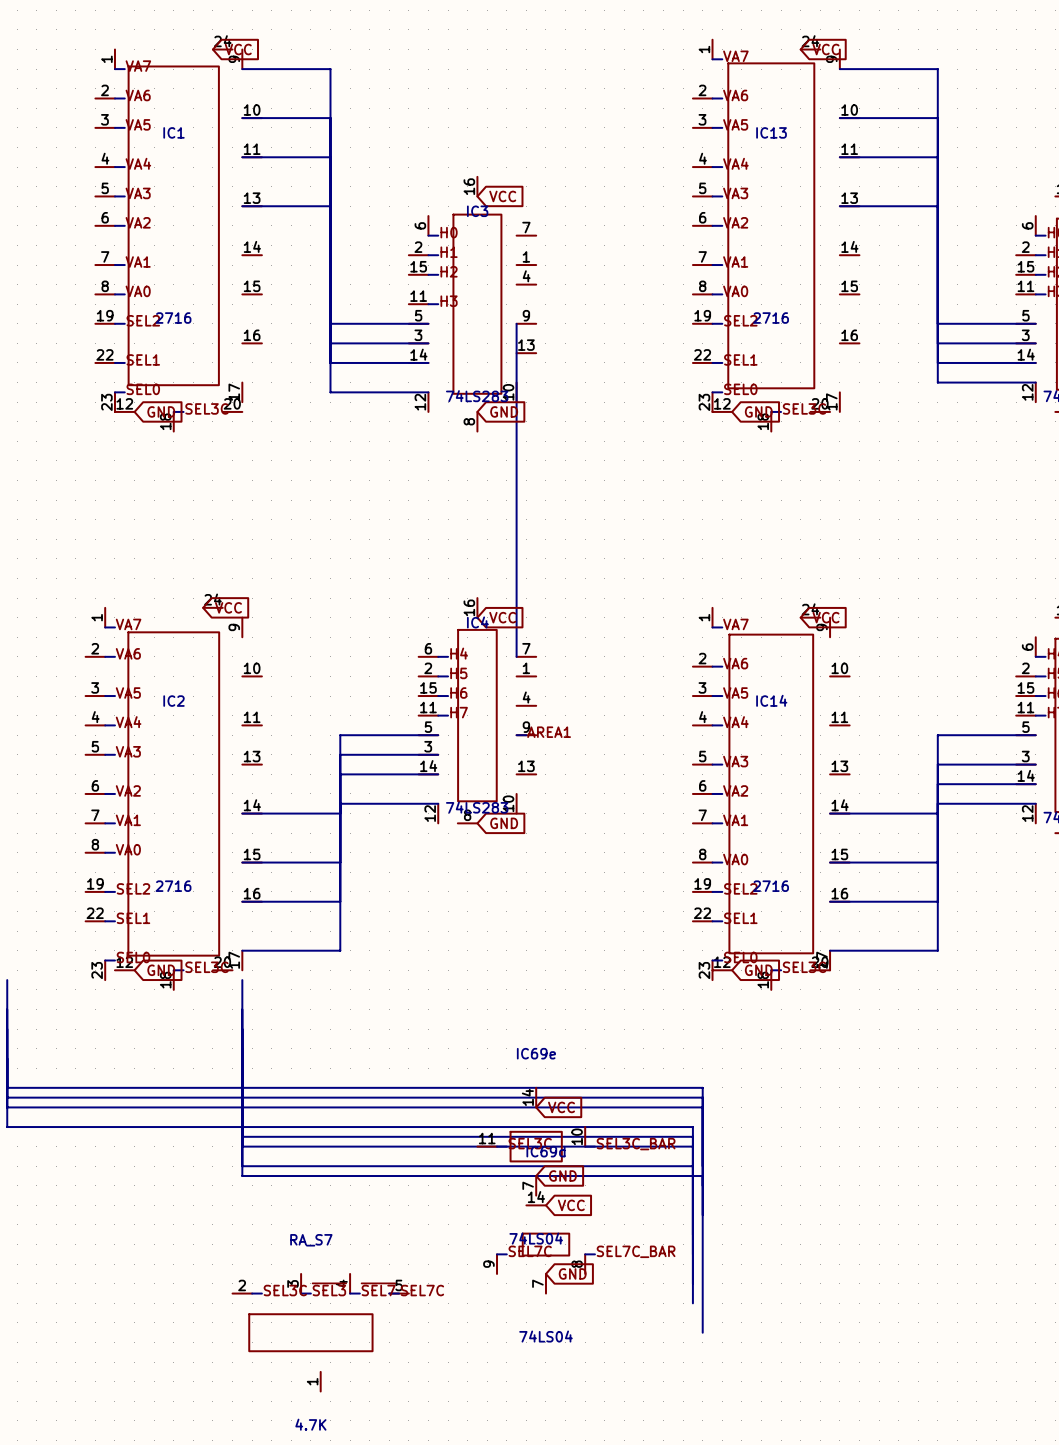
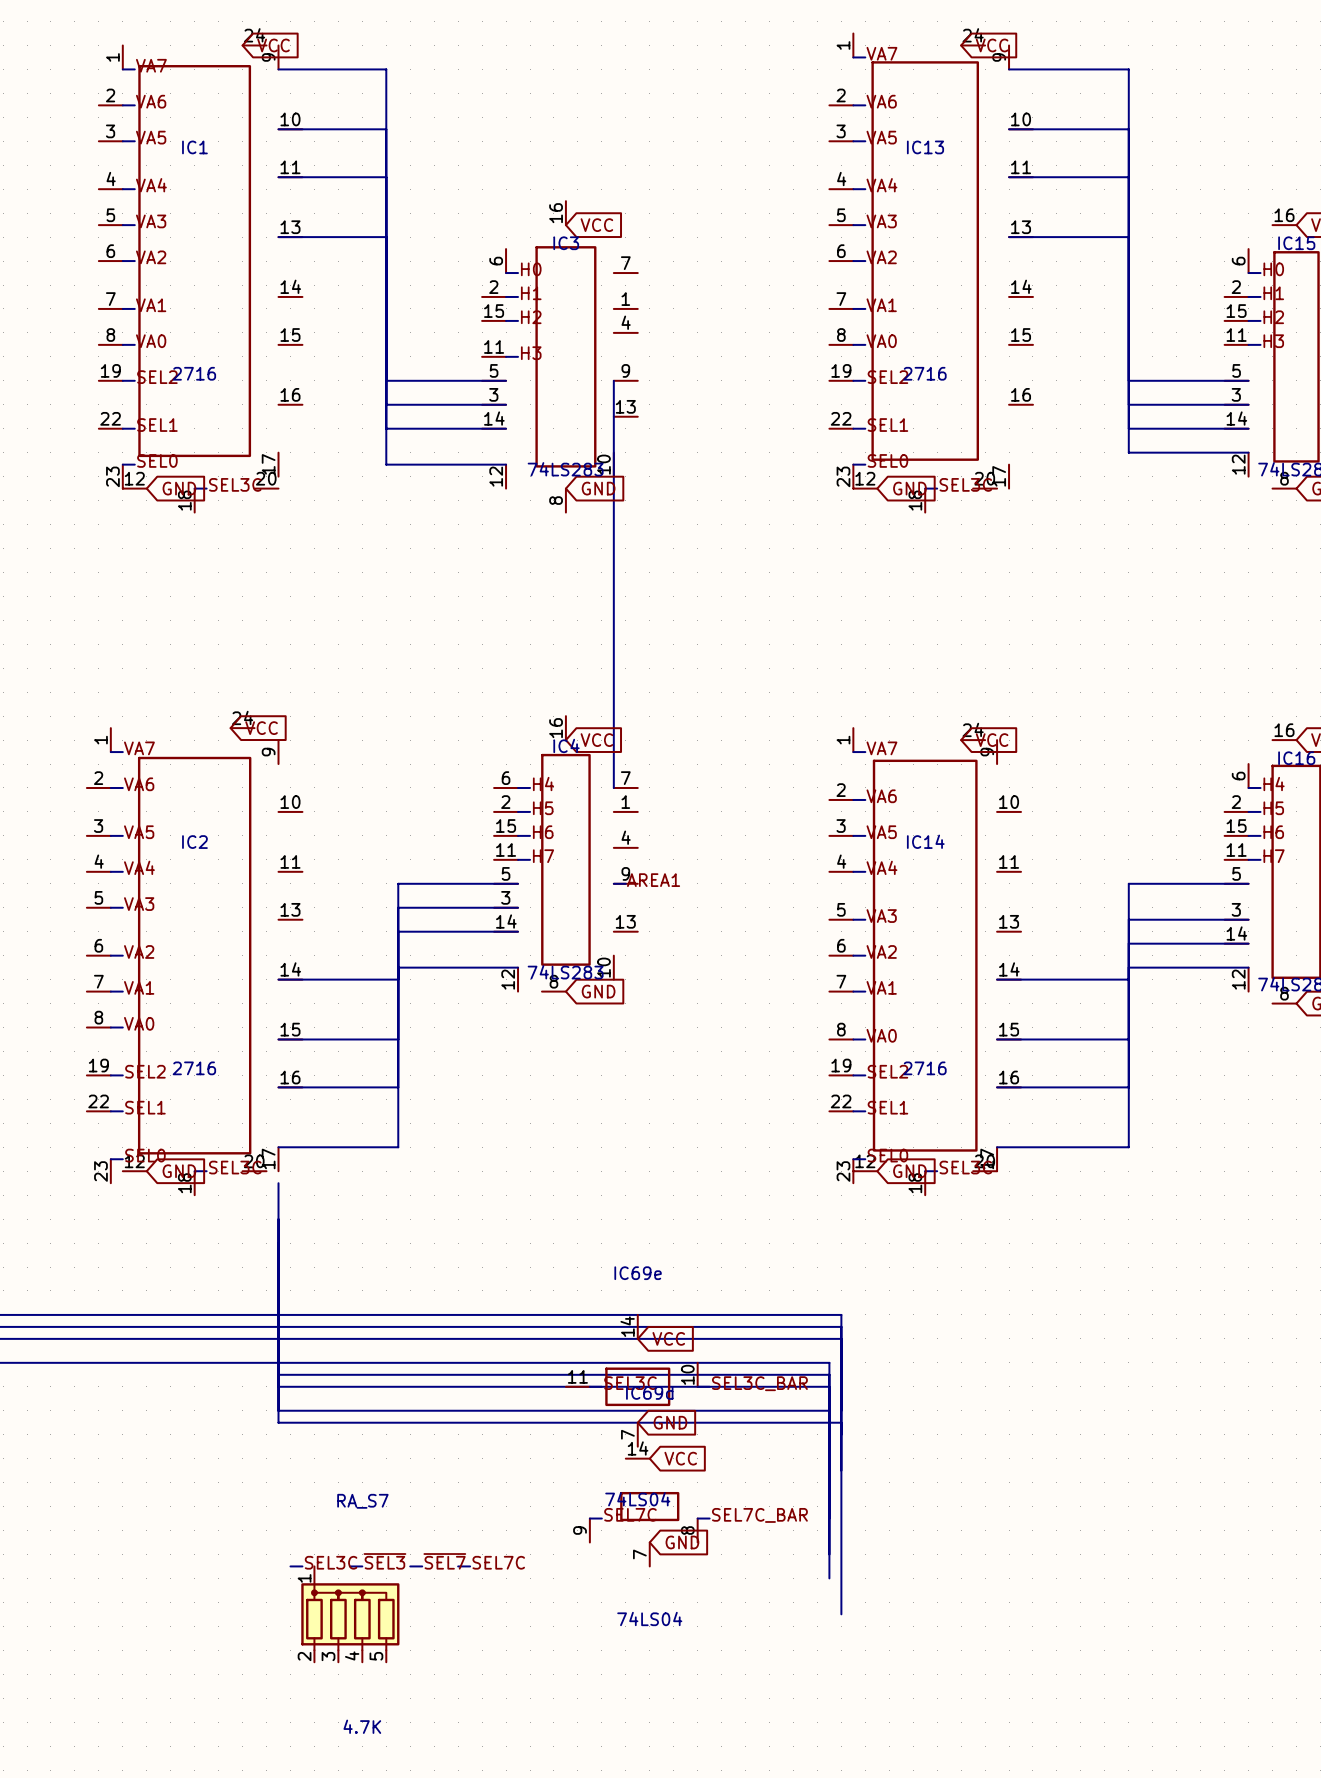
RA_S7 symbol: [232, 1273, 409, 1392] -> [301, 1566, 400, 1663]

